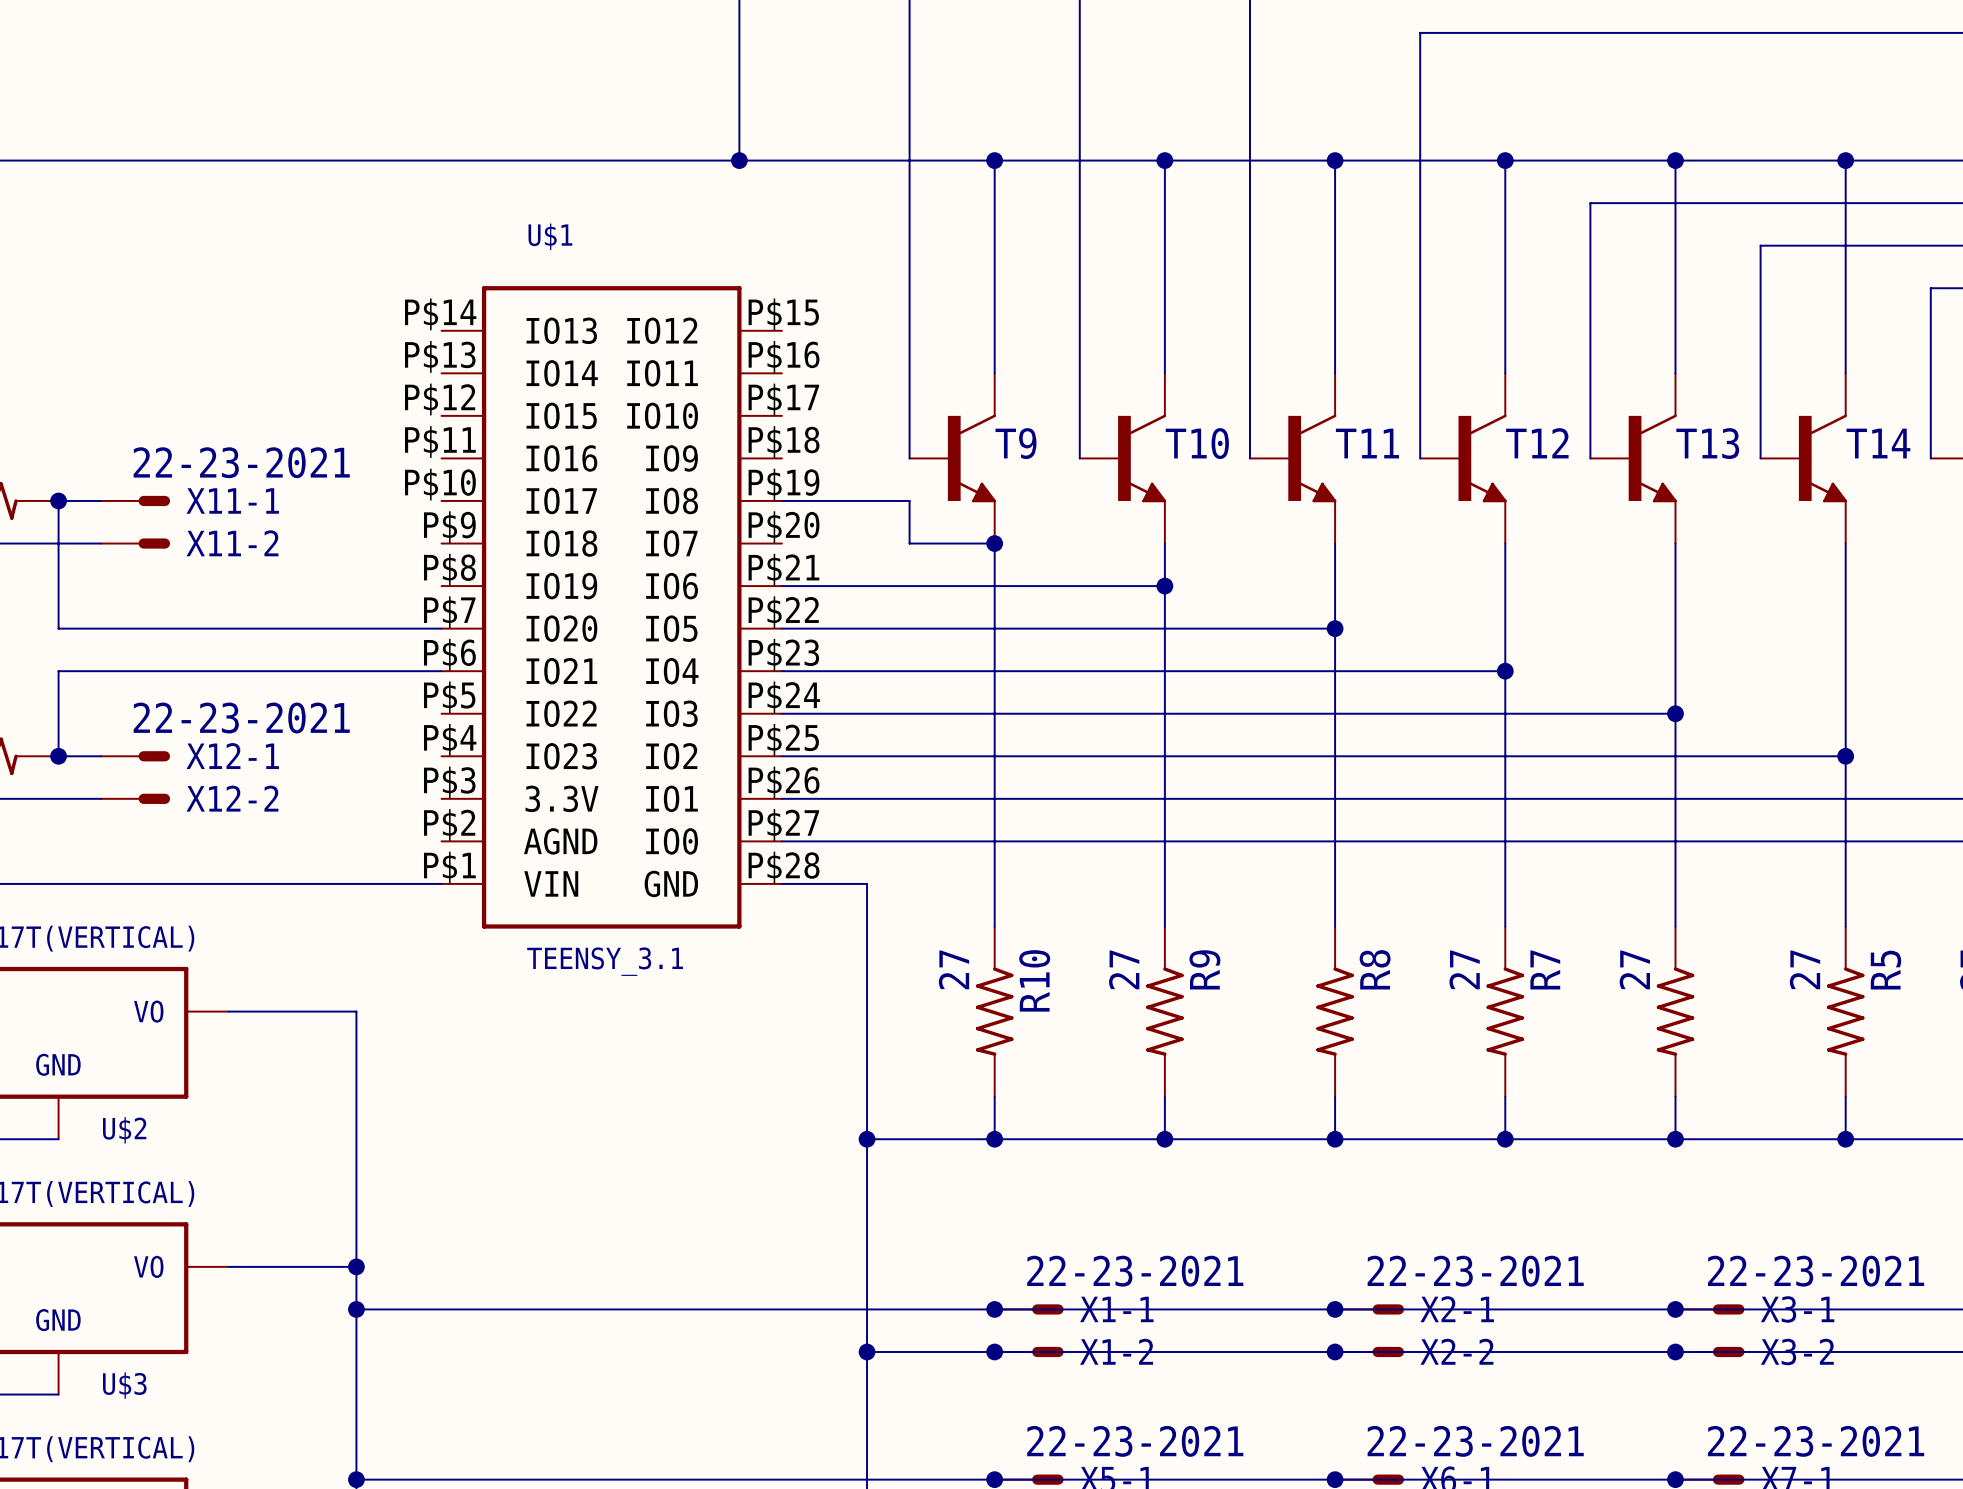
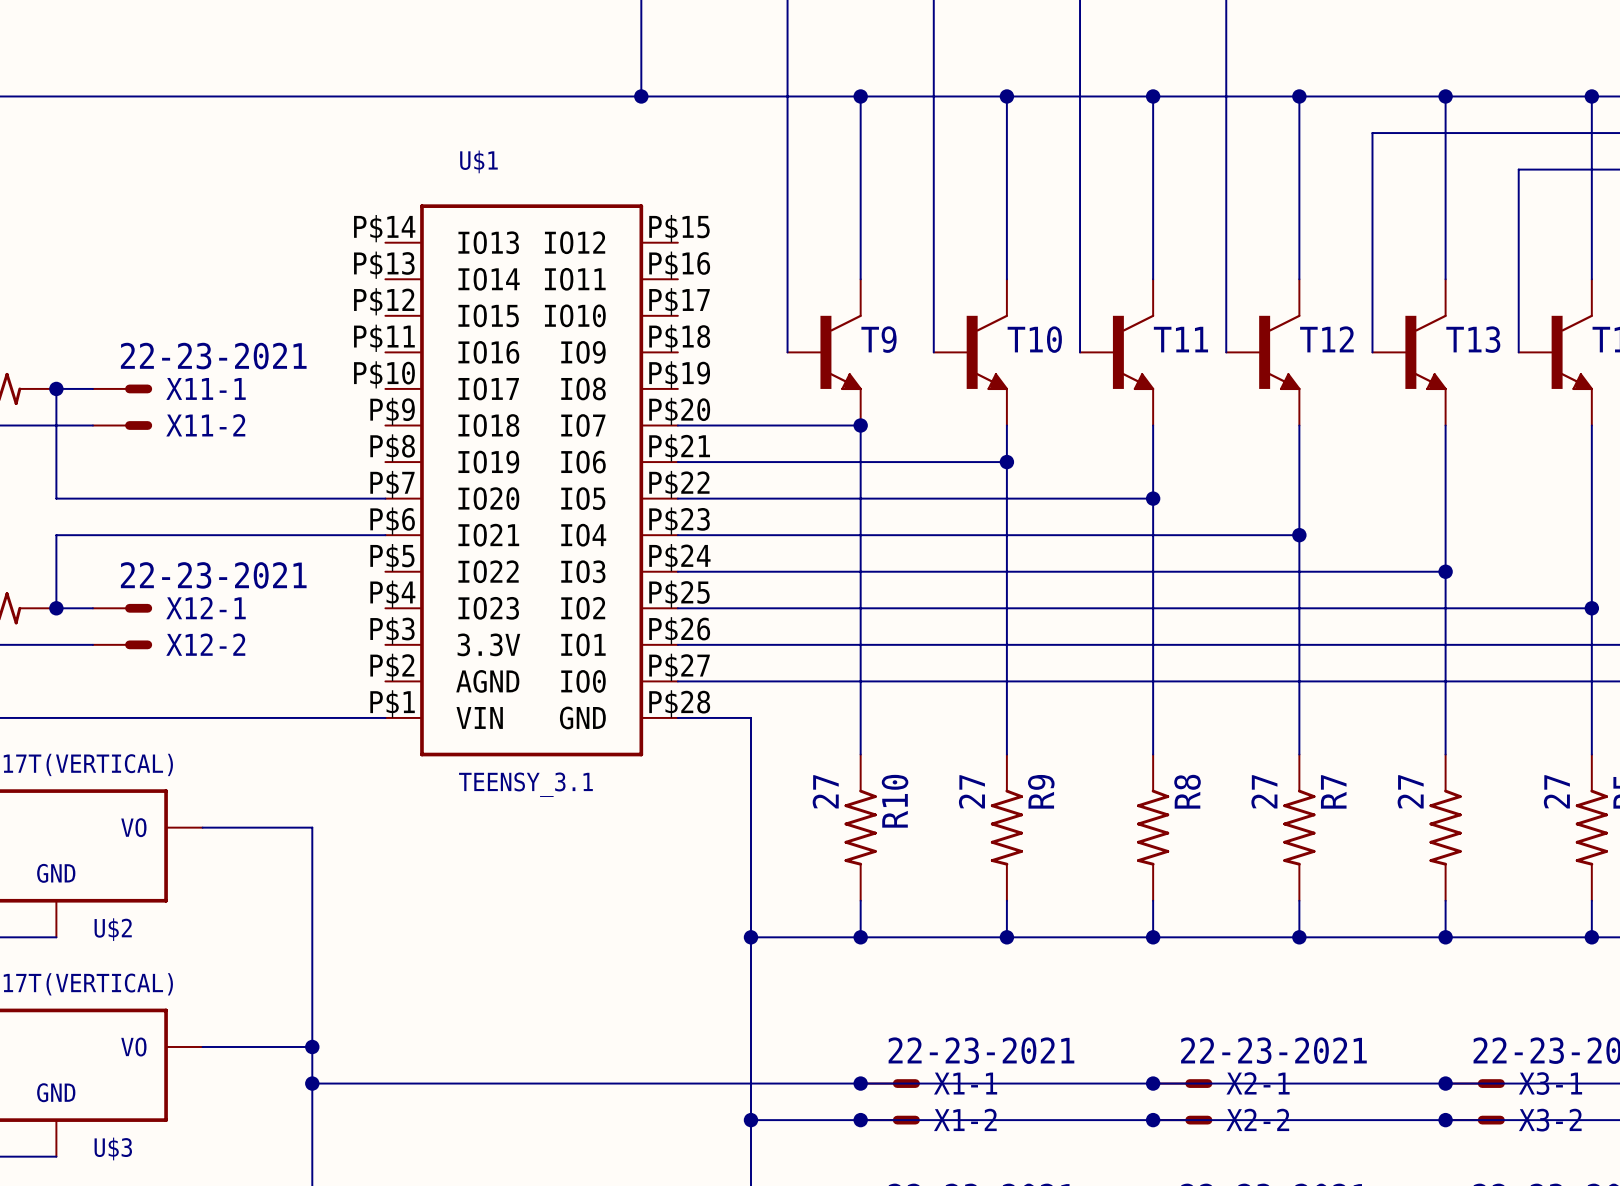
wire: (781, 500) (909, 500) (909, 543) -> (677, 425) (787, 425)

